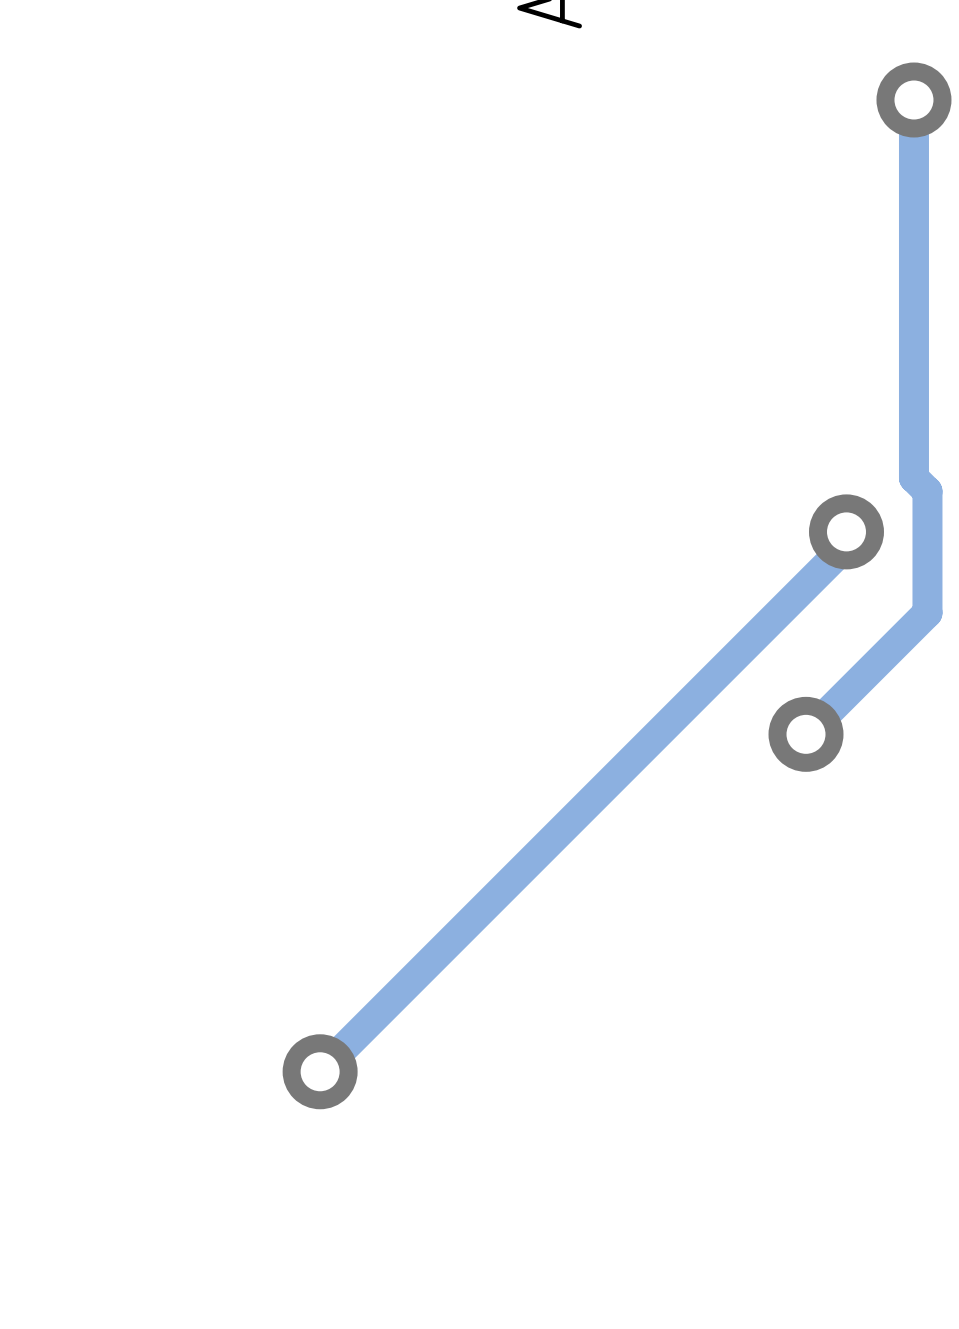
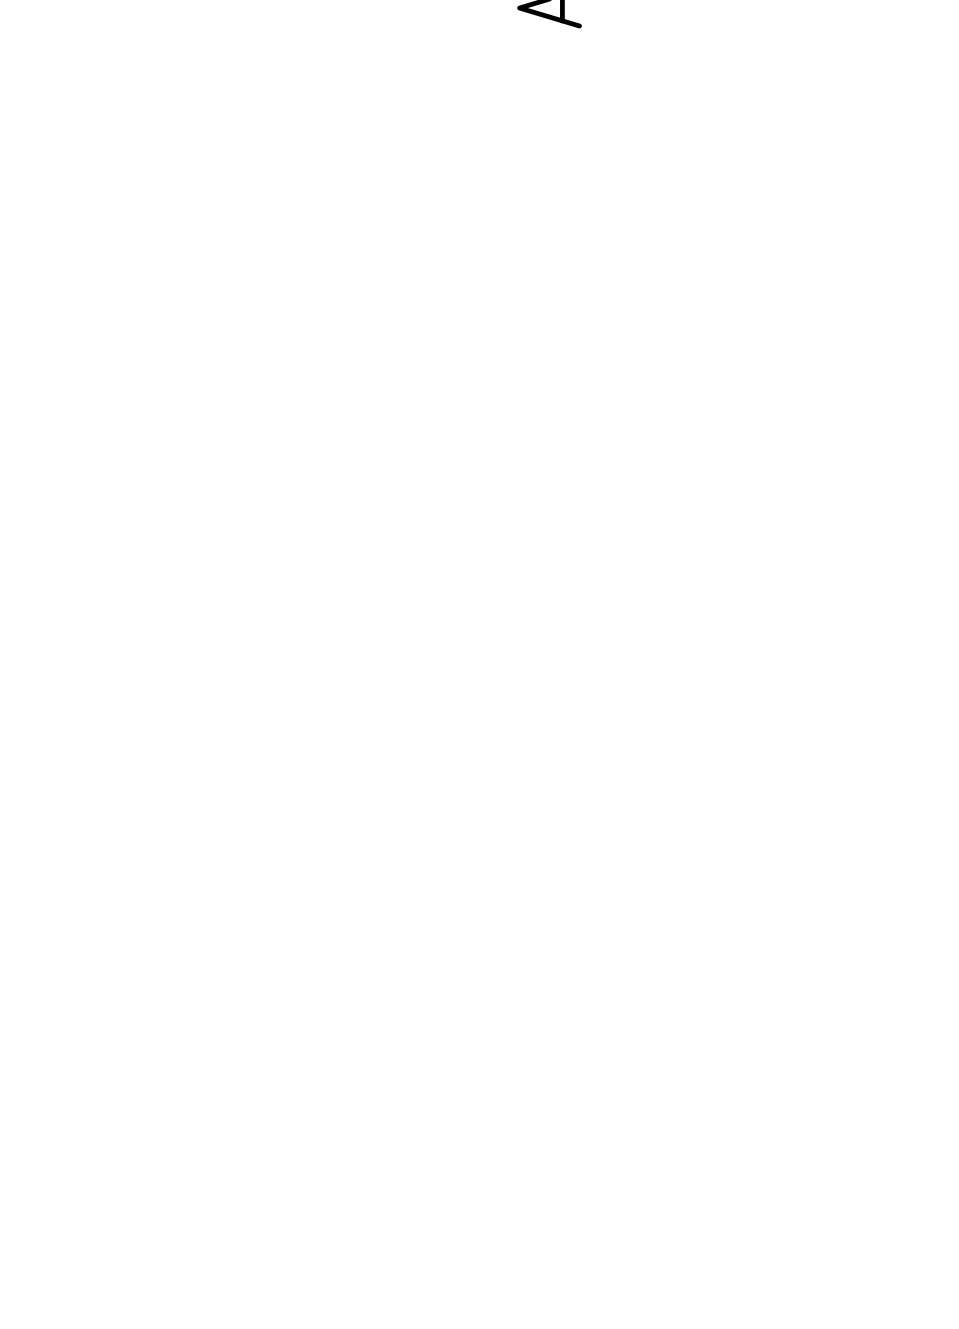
track: (913, 100) (913, 477) (927, 491) (927, 612) (806, 734) -> none
via: (913, 100) -> none
track: (846, 531) (846, 545) (320, 1071) -> none
via: (846, 531) -> none
via: (806, 734) -> none
via: (320, 1071) -> none

